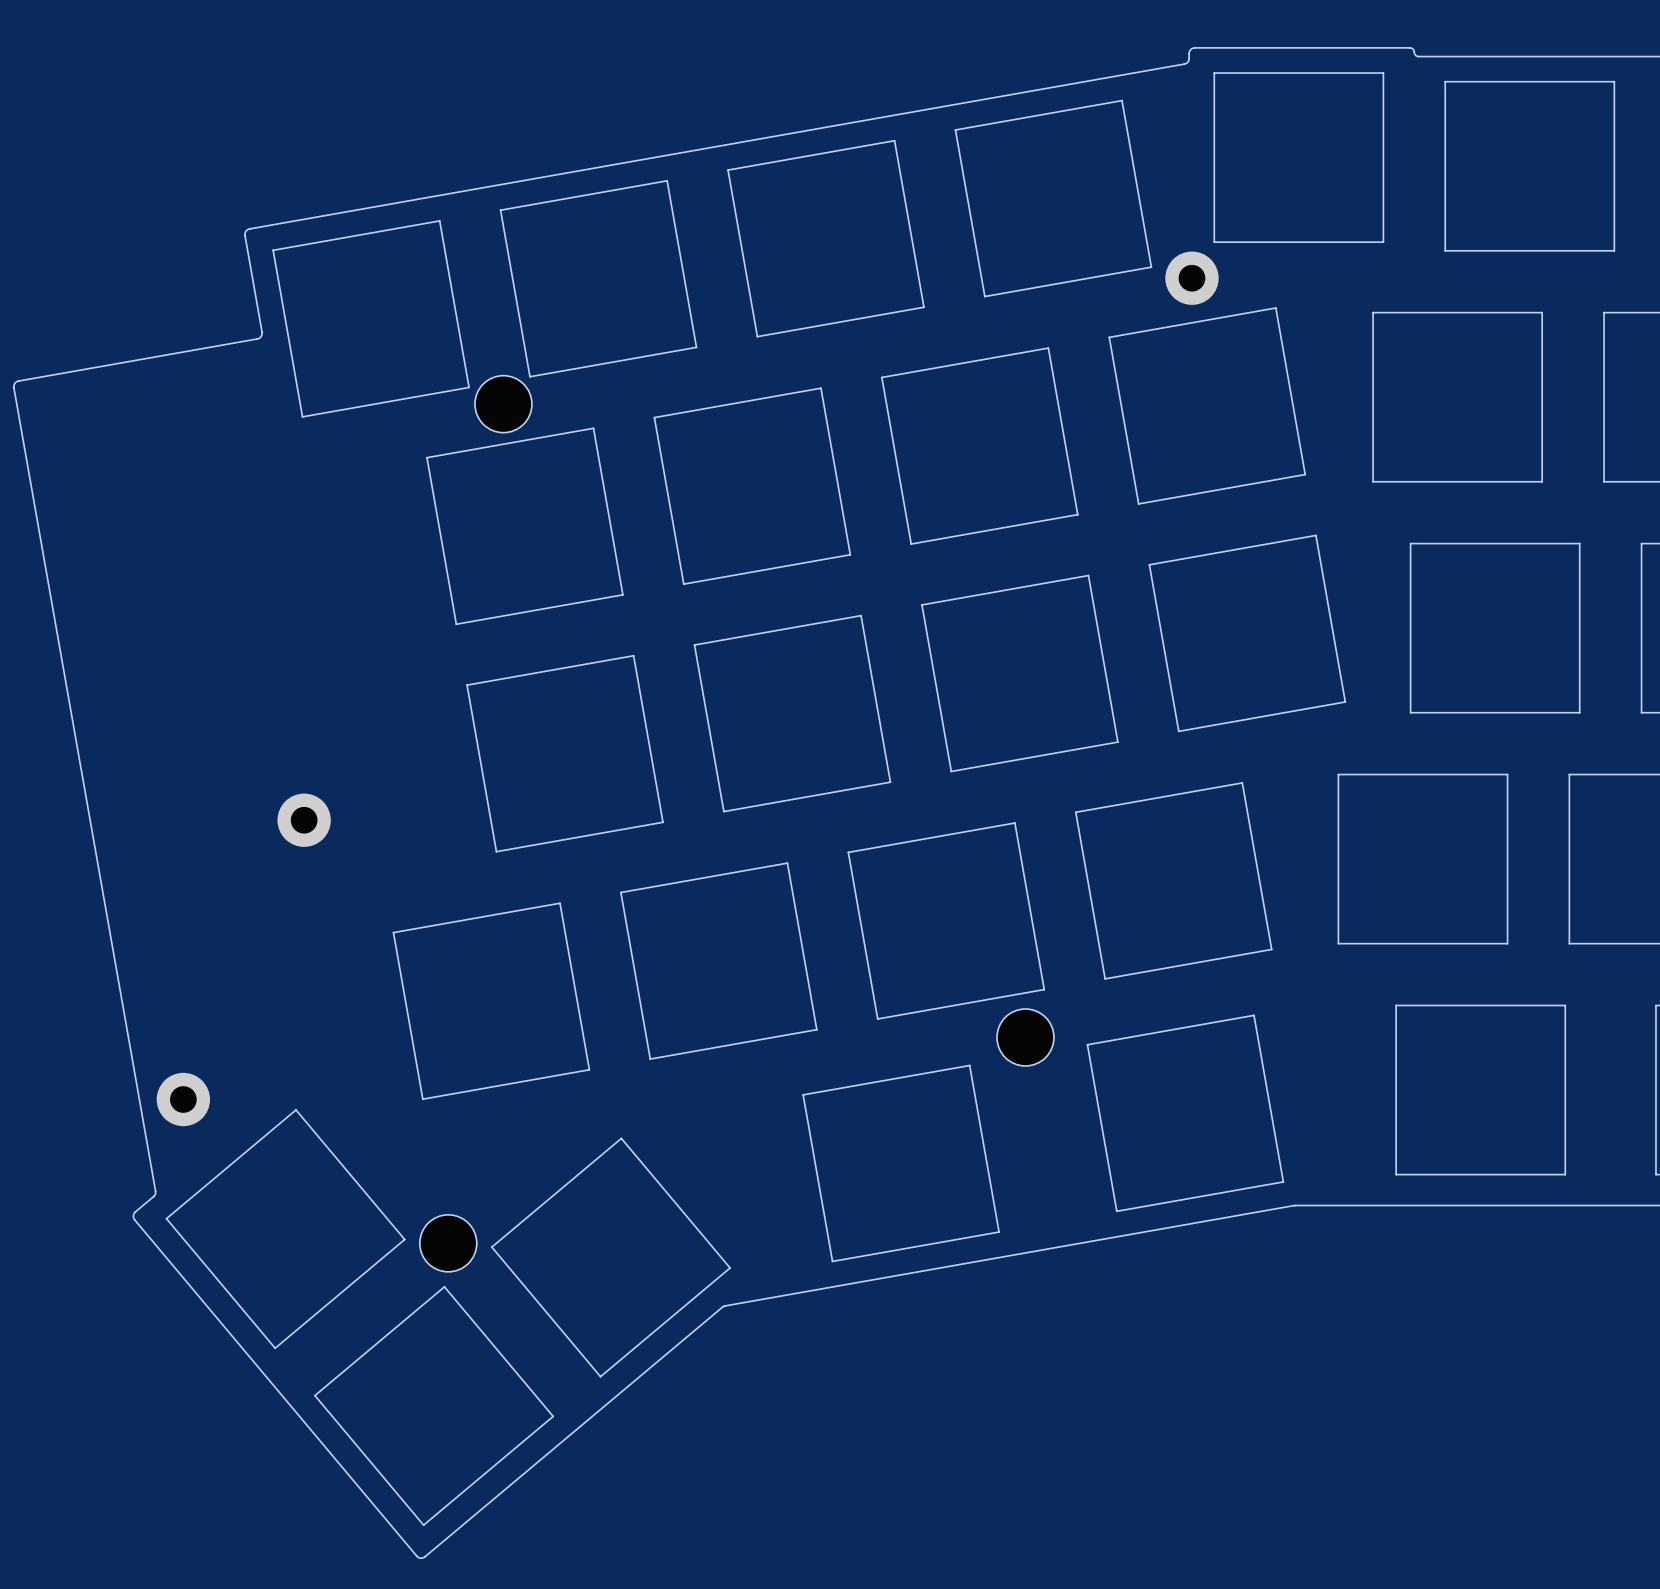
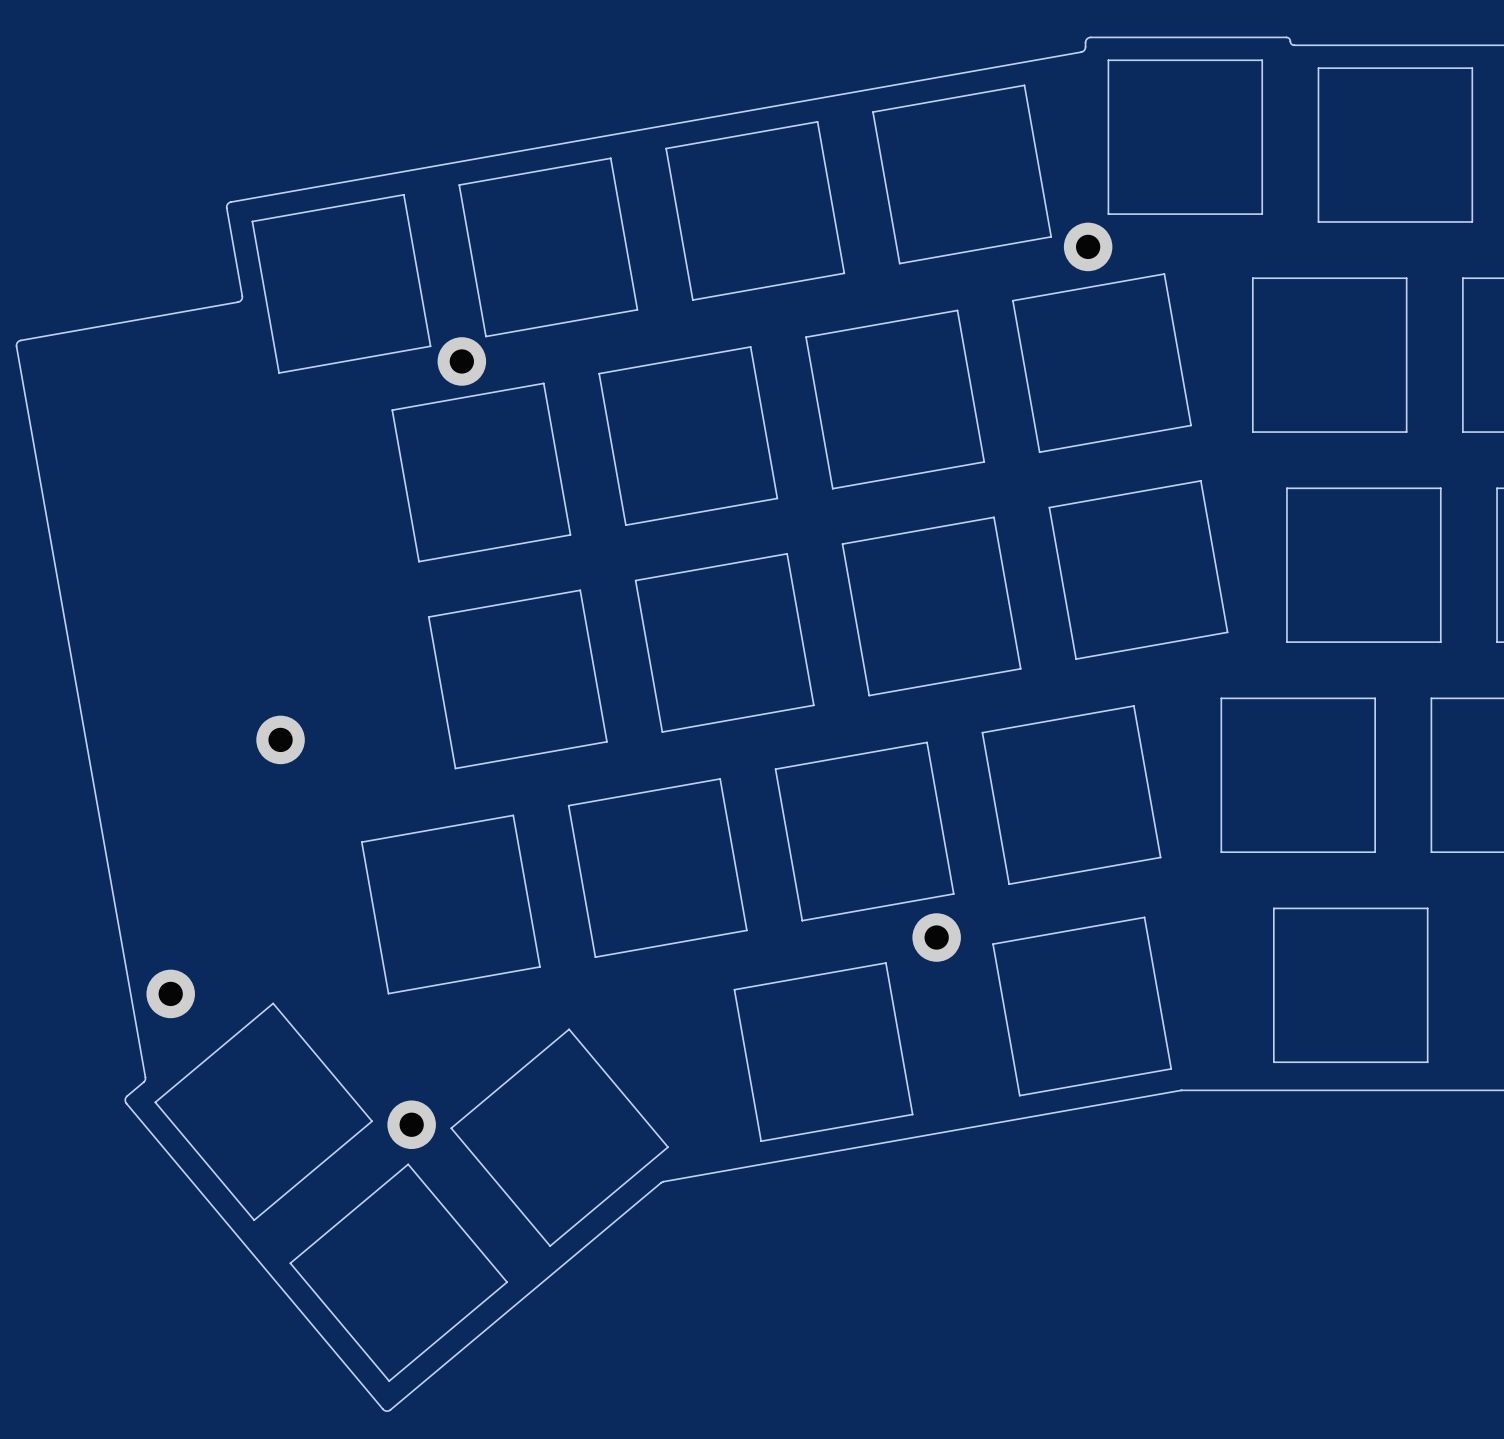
part footprint: [474, 375, 532, 433] -> [437, 337, 487, 386]
part footprint: [996, 1009, 1054, 1066] -> [912, 913, 961, 962]
part footprint: [419, 1214, 477, 1272] -> [387, 1100, 436, 1150]

